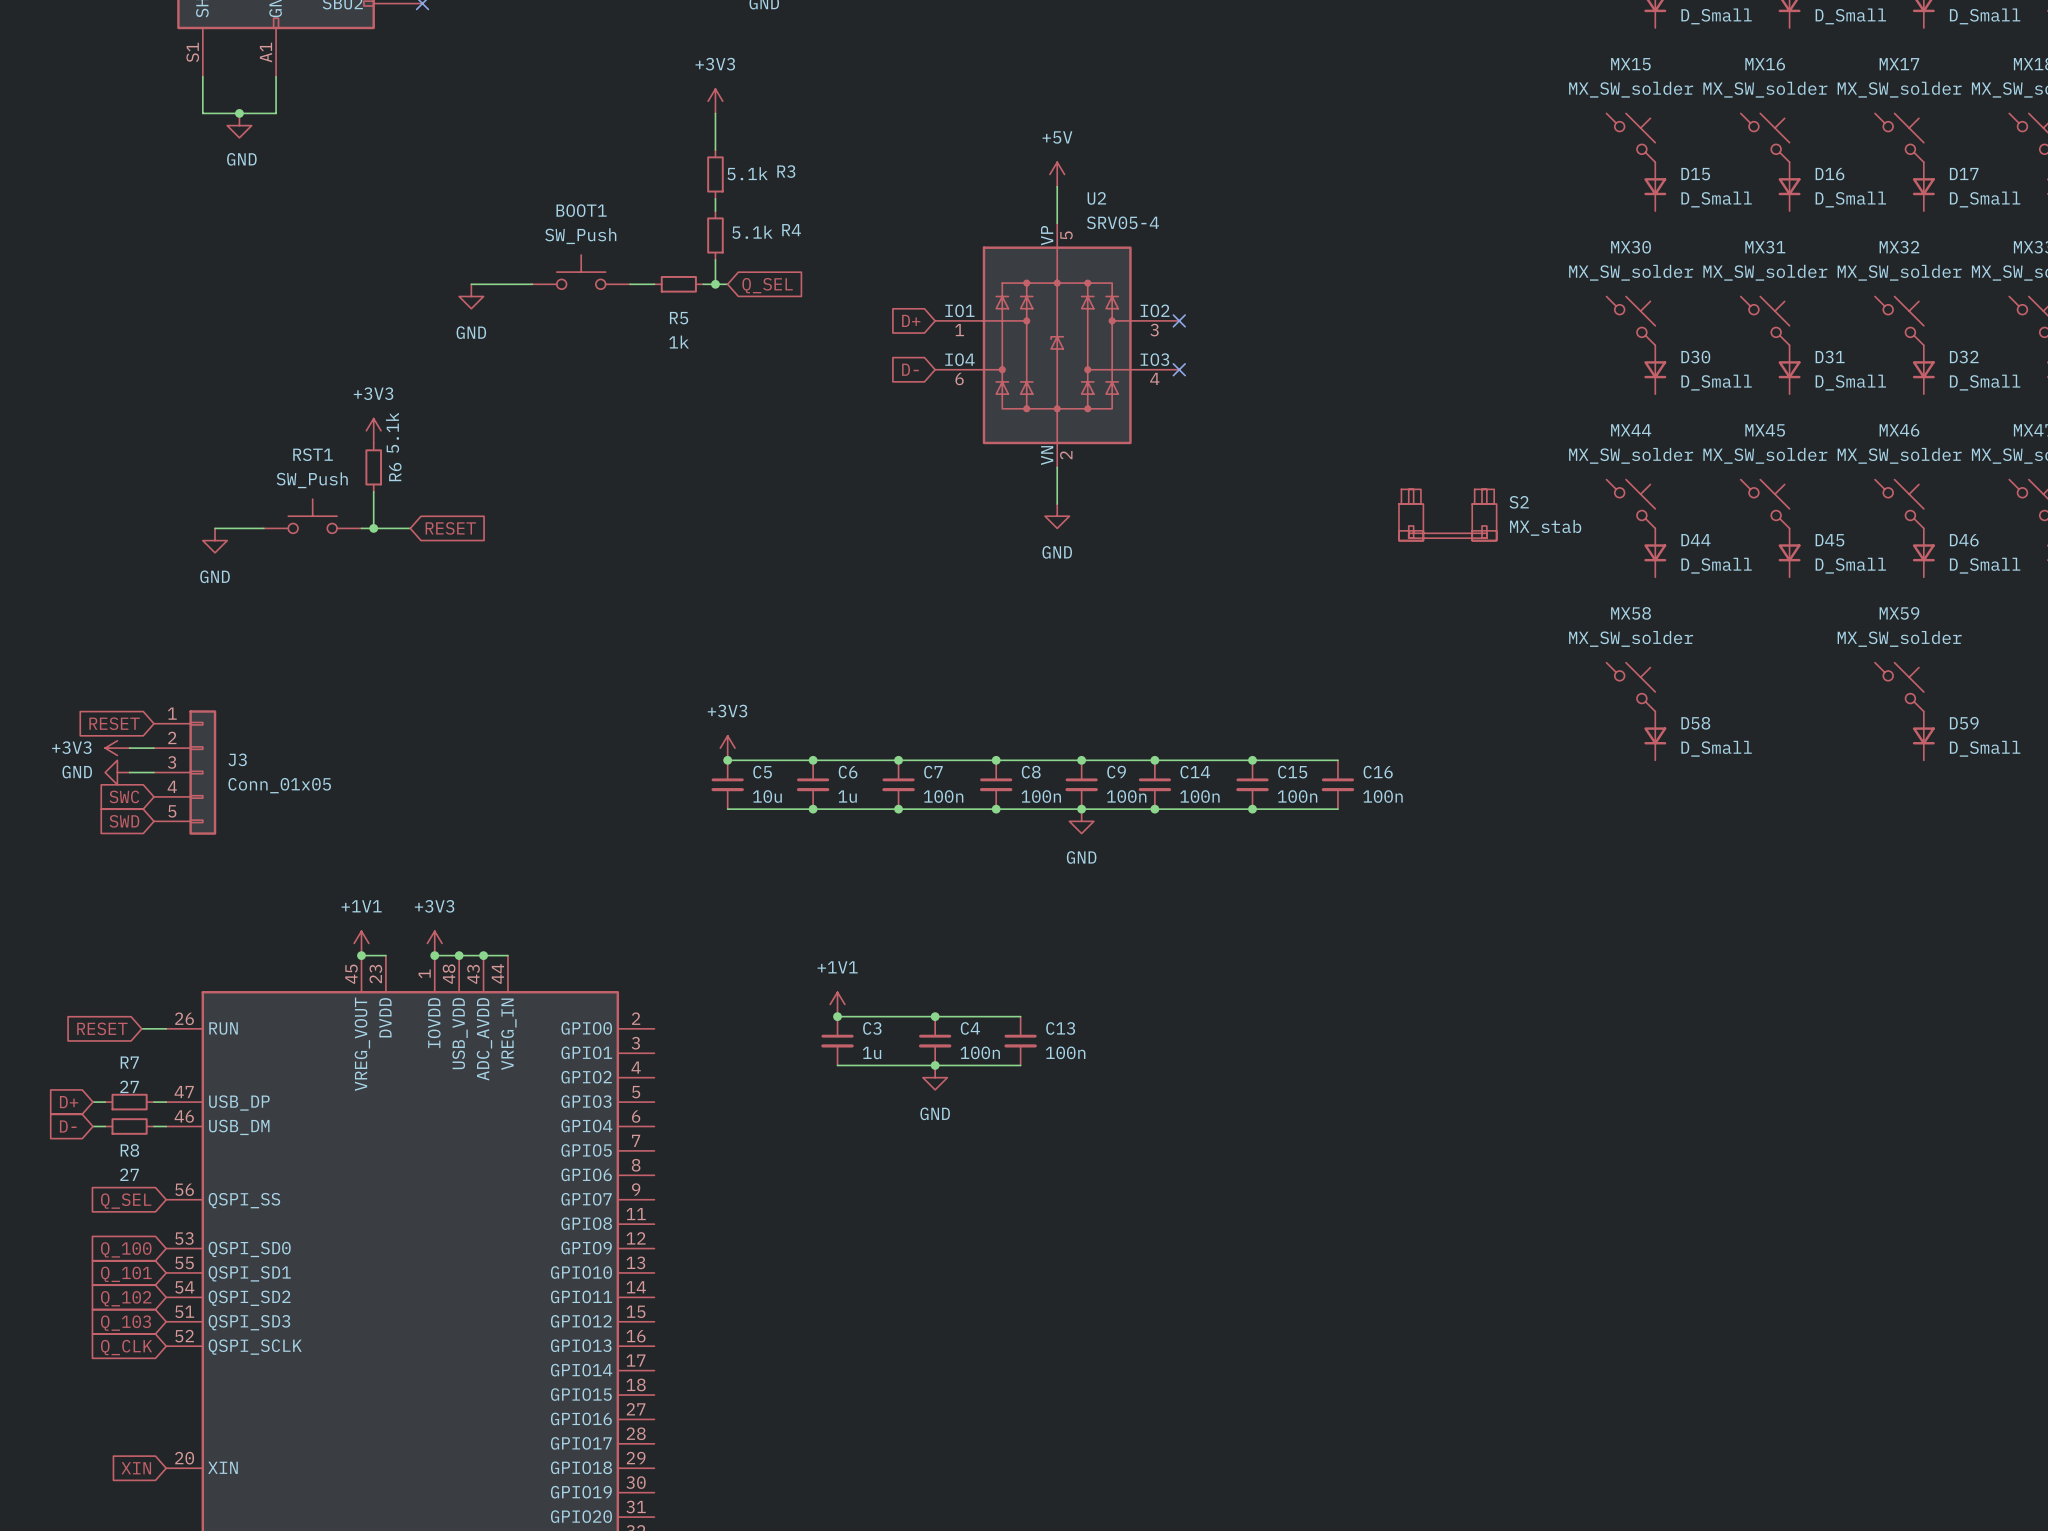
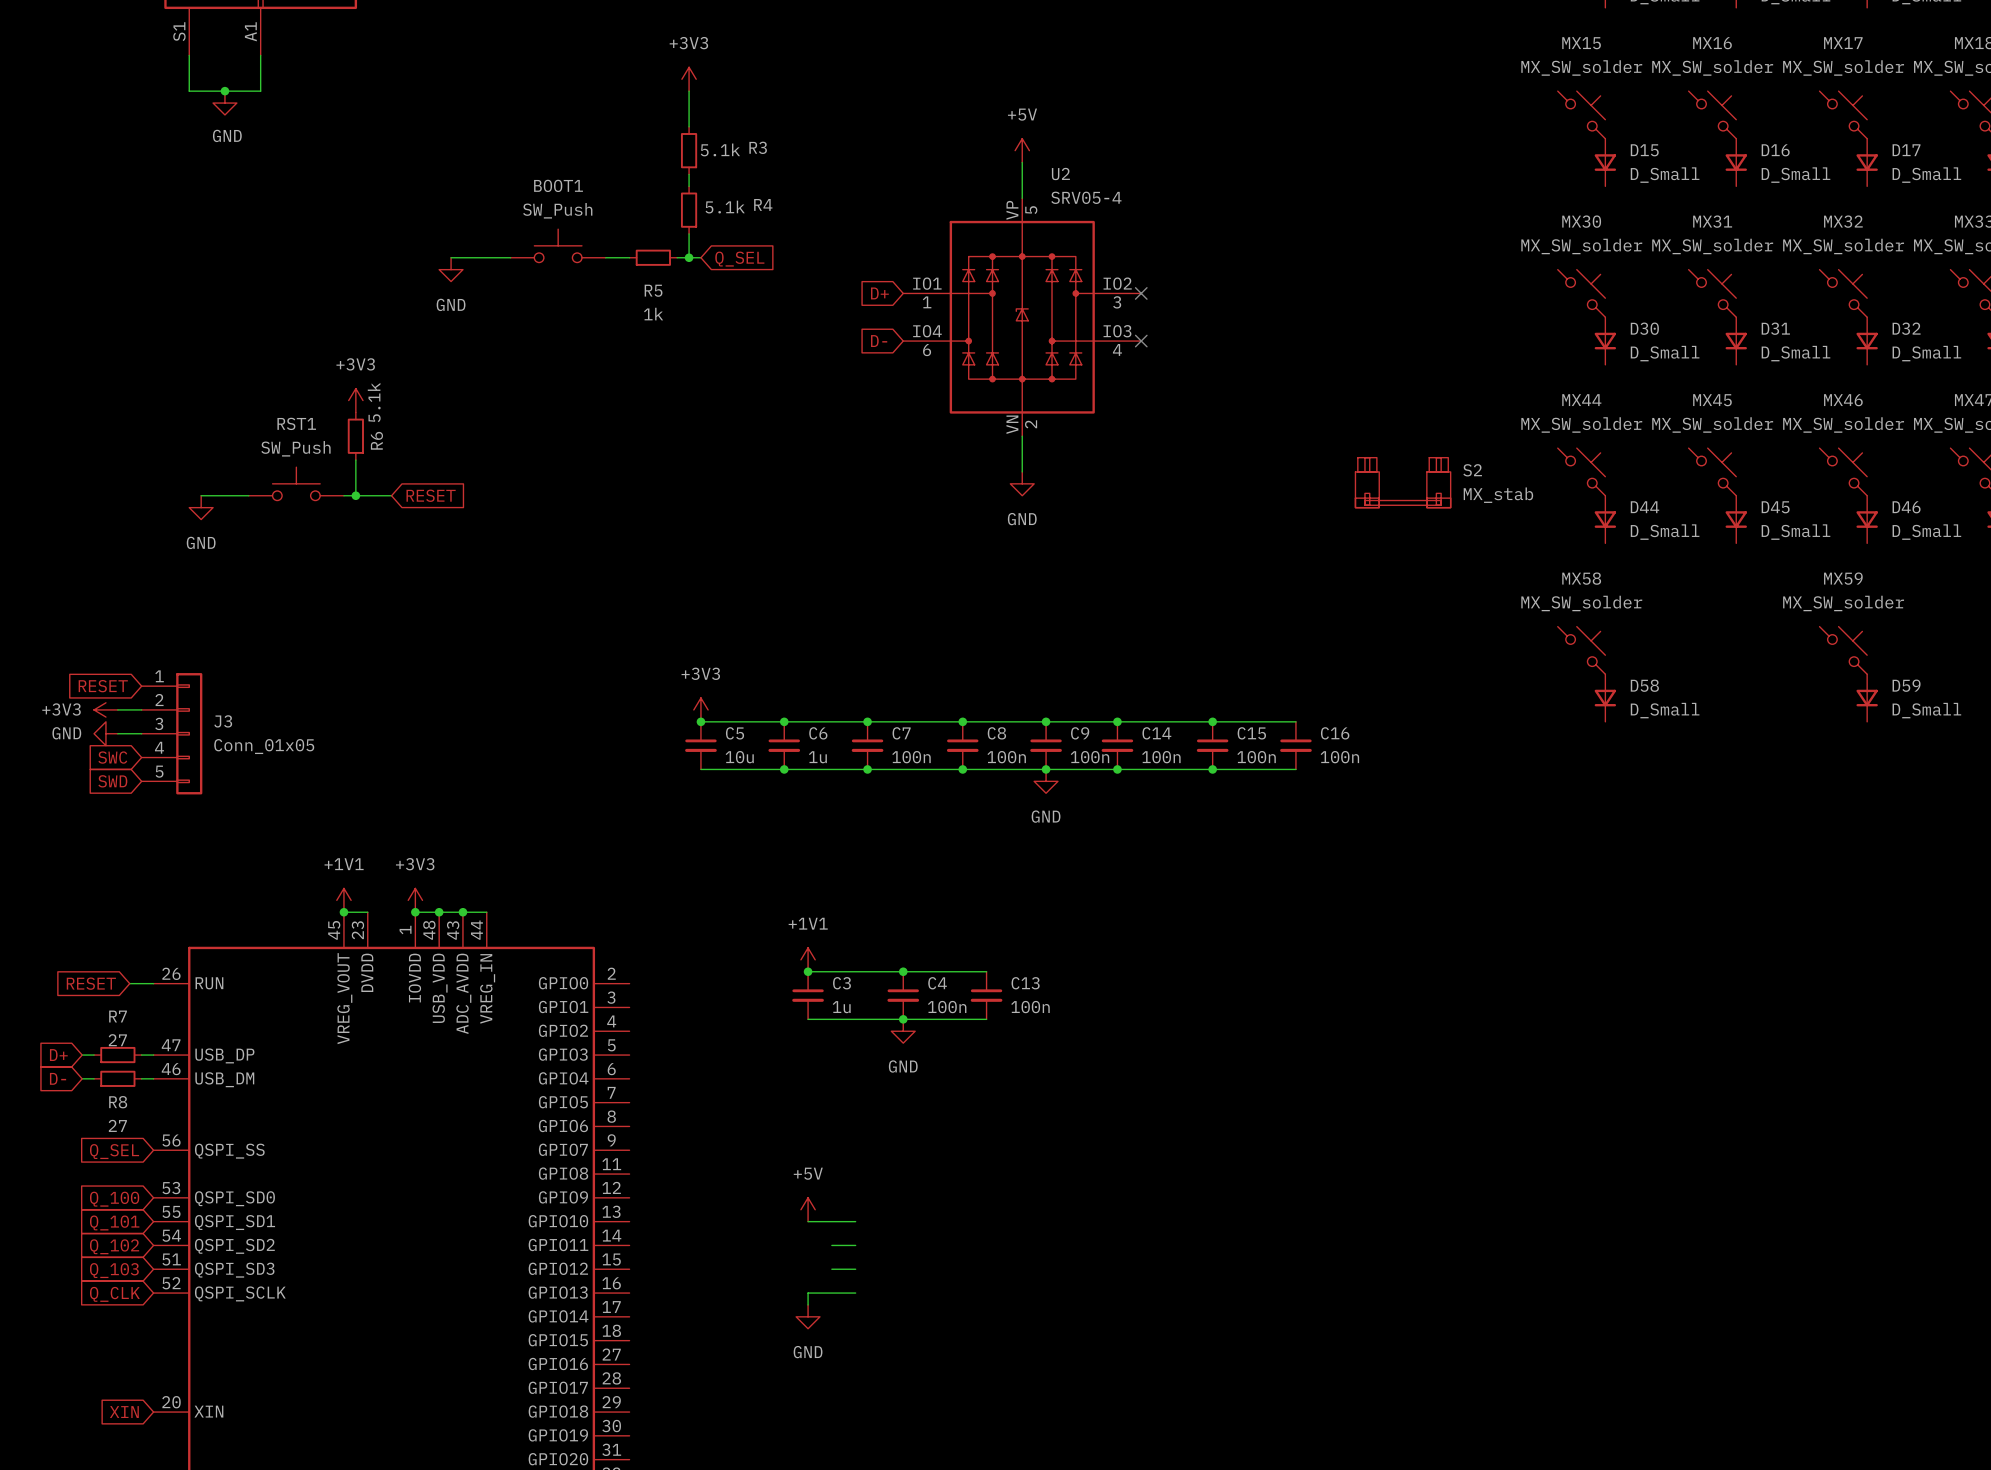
power symbol: none -> +5V (808, 1209)
wire: none -> (808, 1221) (855, 1221)
wire: none -> (831, 1245) (855, 1245)
wire: none -> (831, 1269) (855, 1269)
wire: none -> (855, 1293) (808, 1293) (808, 1304)
power symbol: none -> GND (808, 1316)

